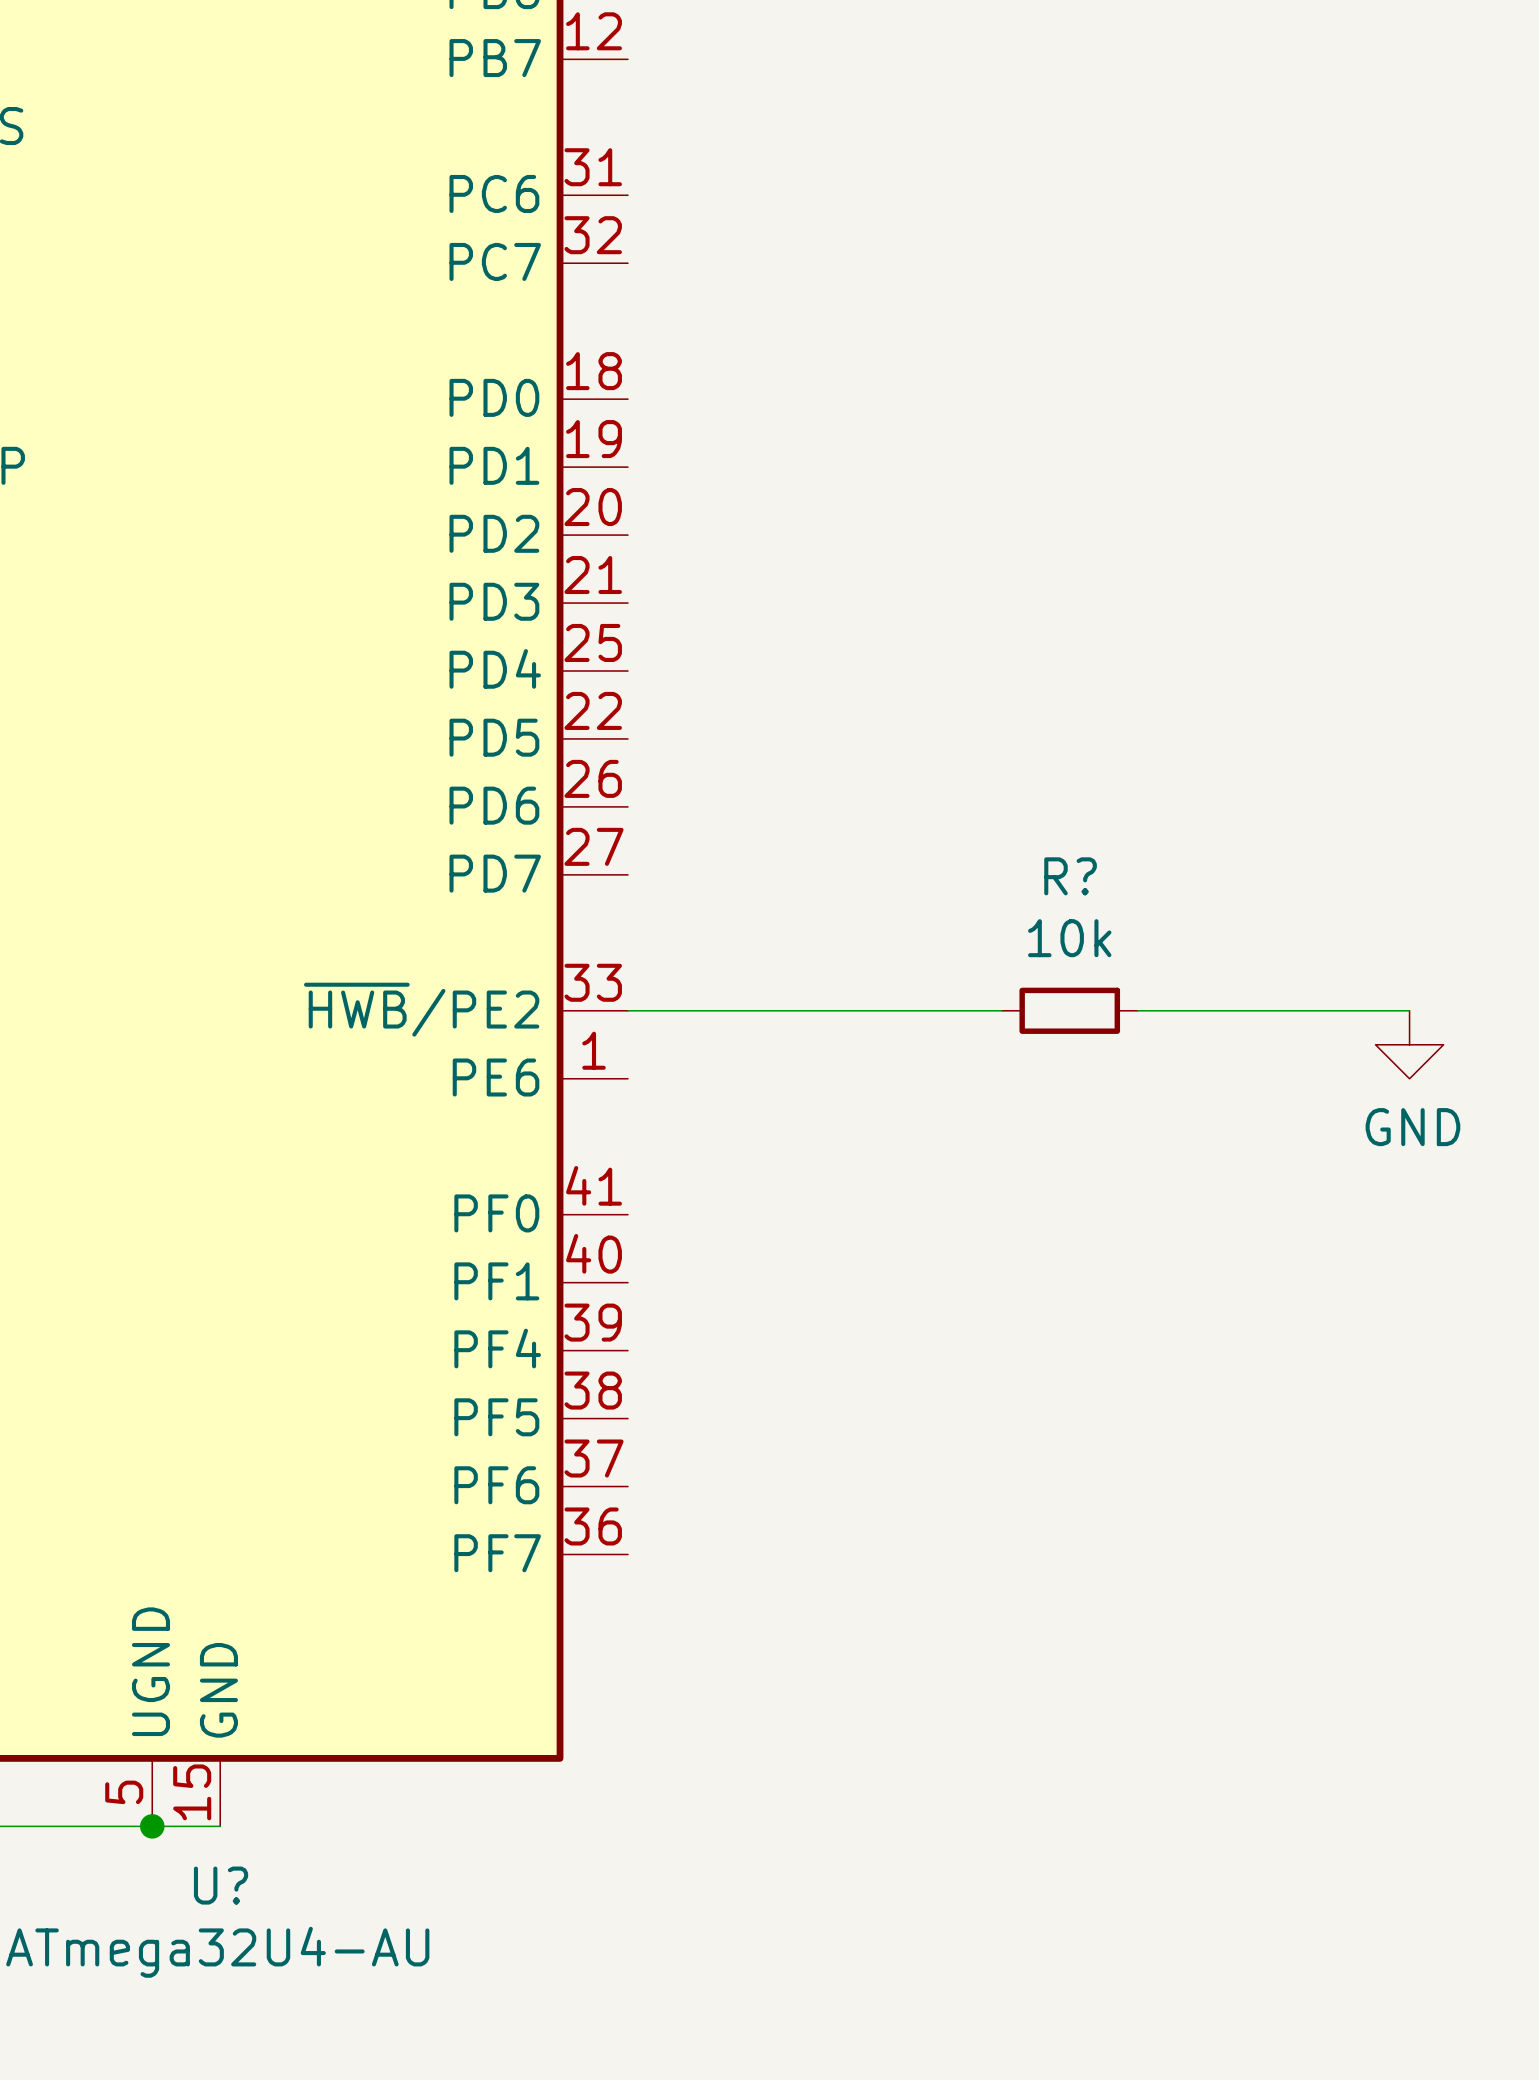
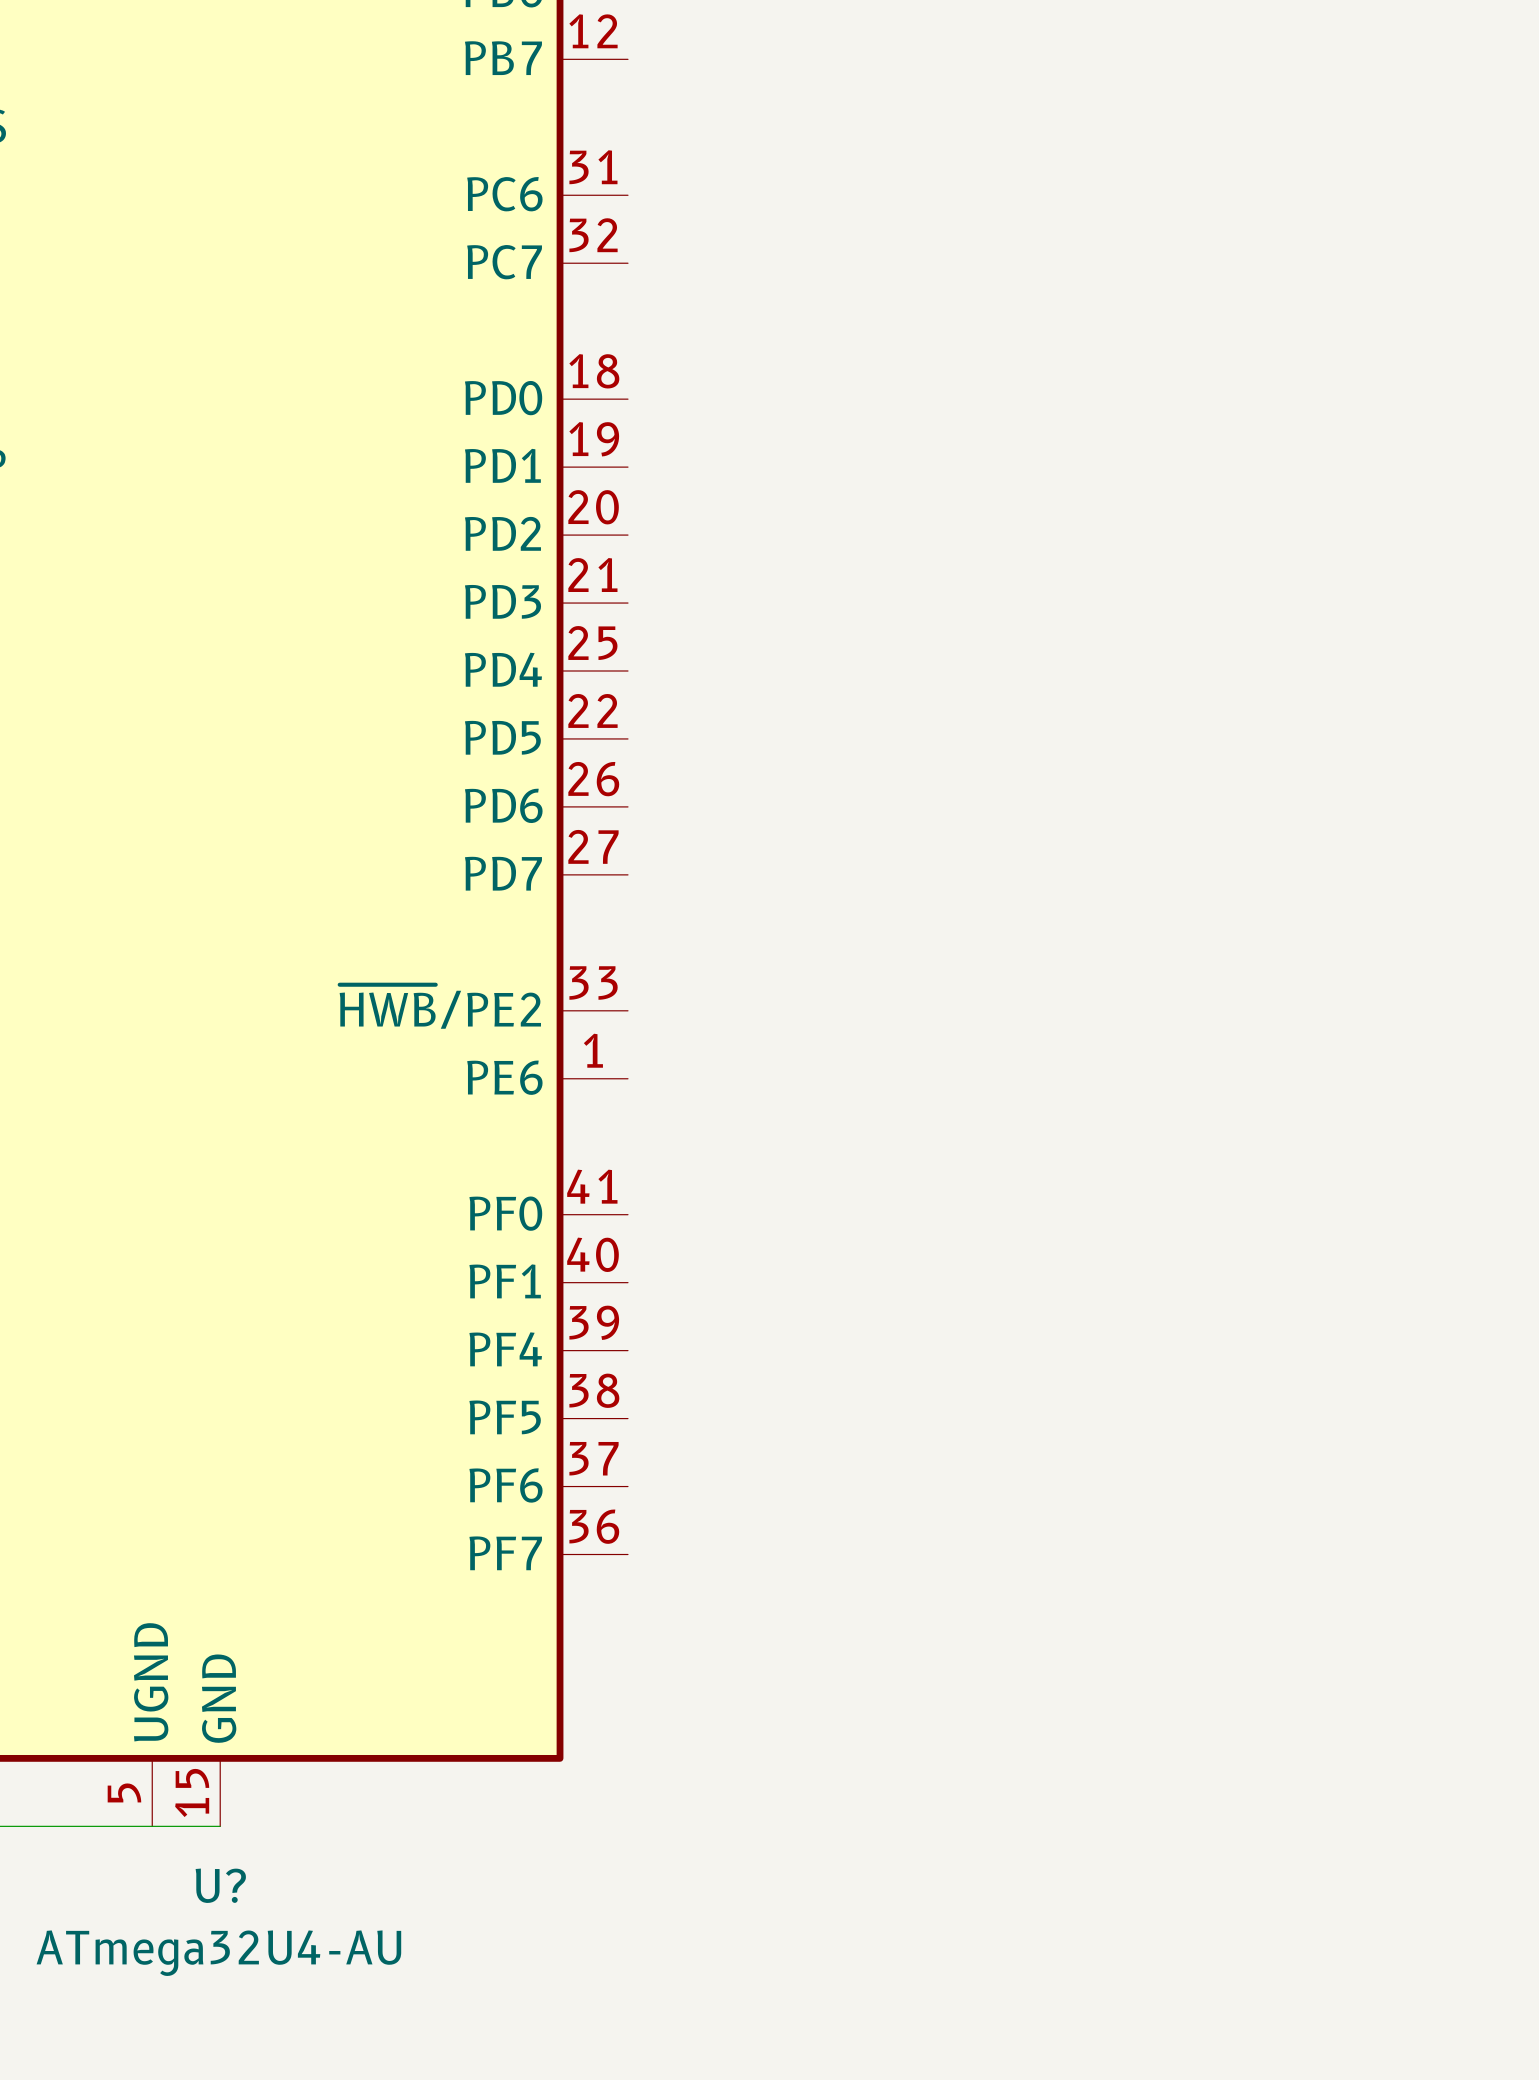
wire: (627, 1010) (1001, 1010) -> none
R?: 10k (1069, 1010) -> none
wire: (1137, 1010) (1409, 1010) -> none
power symbol: GND (1409, 1044) -> none
junction: (152, 1826) -> none

